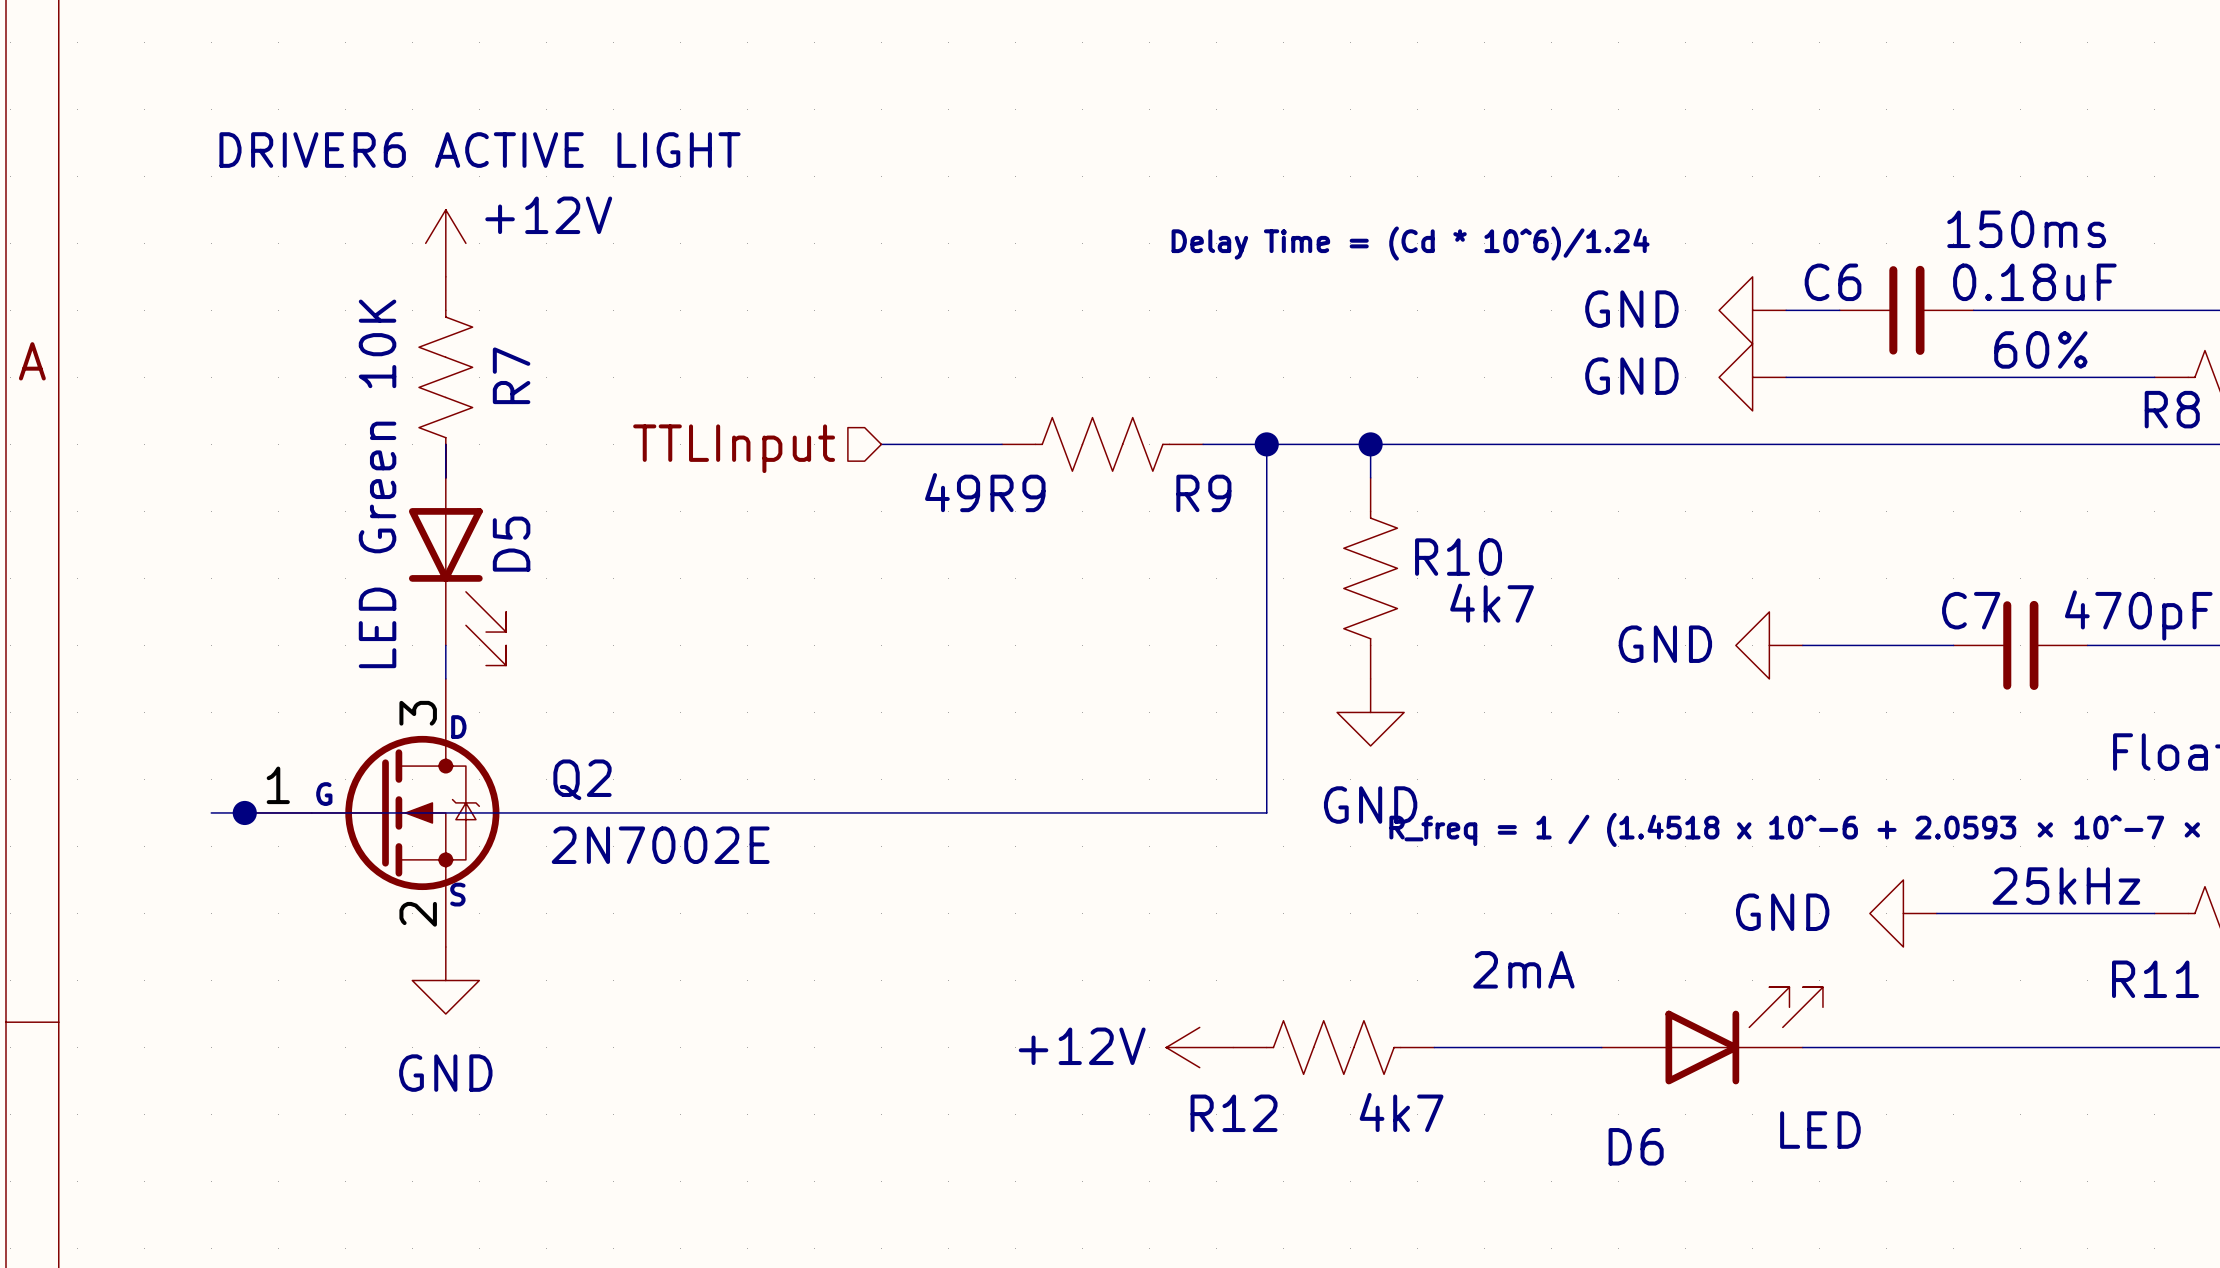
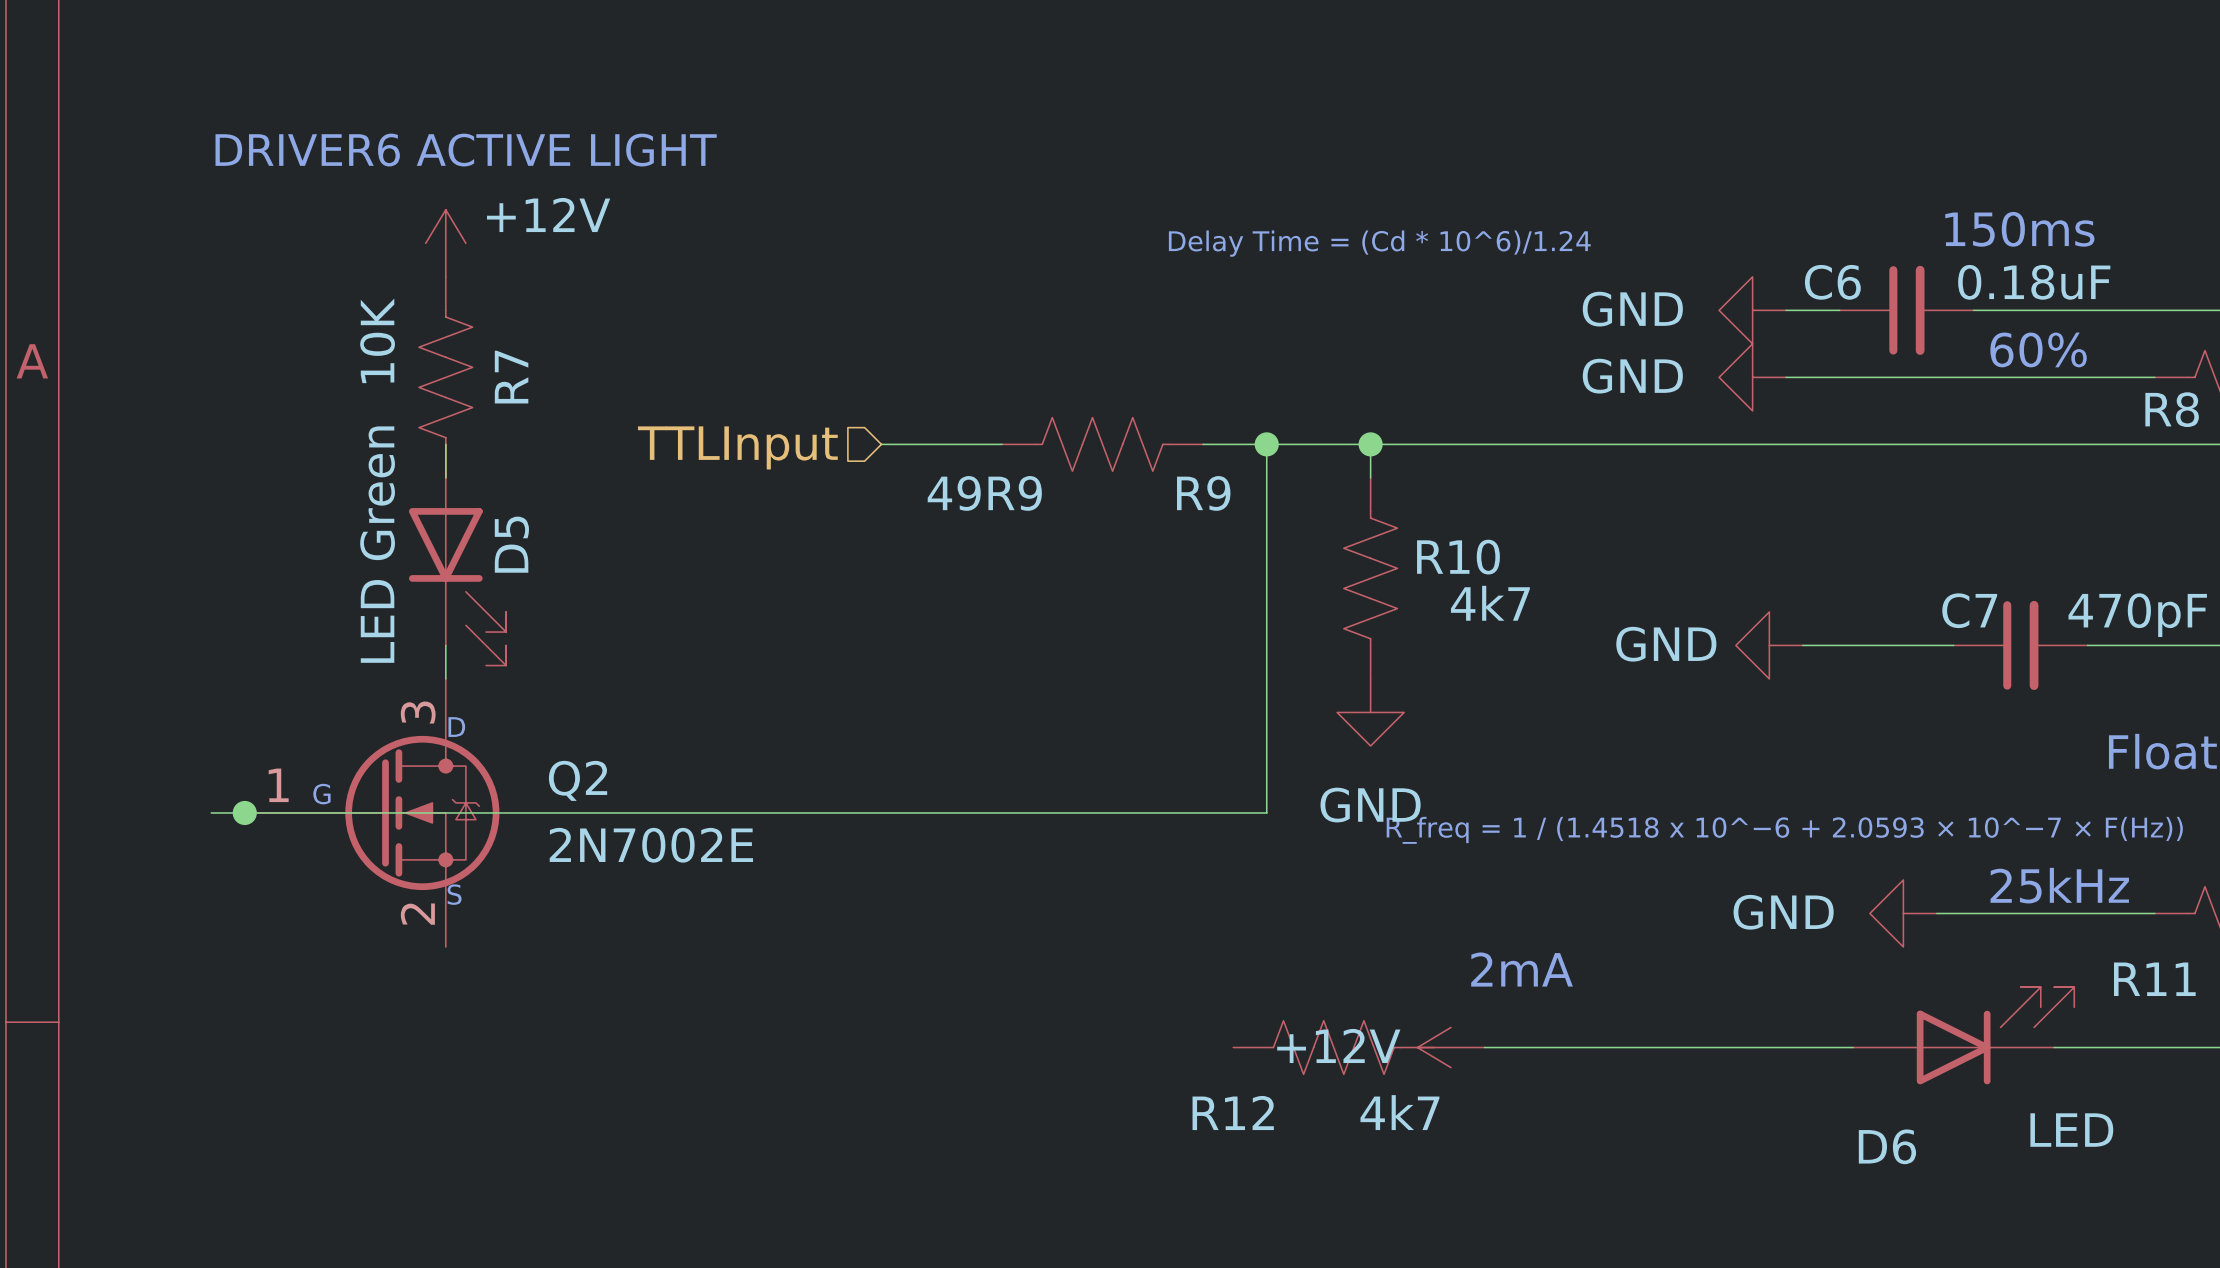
power symbol: GND (445, 980) -> none
D6 position: (1712, 1035) -> (1963, 1035)
power symbol position: +12V (1199, 1047) -> +12V (1451, 1047)

